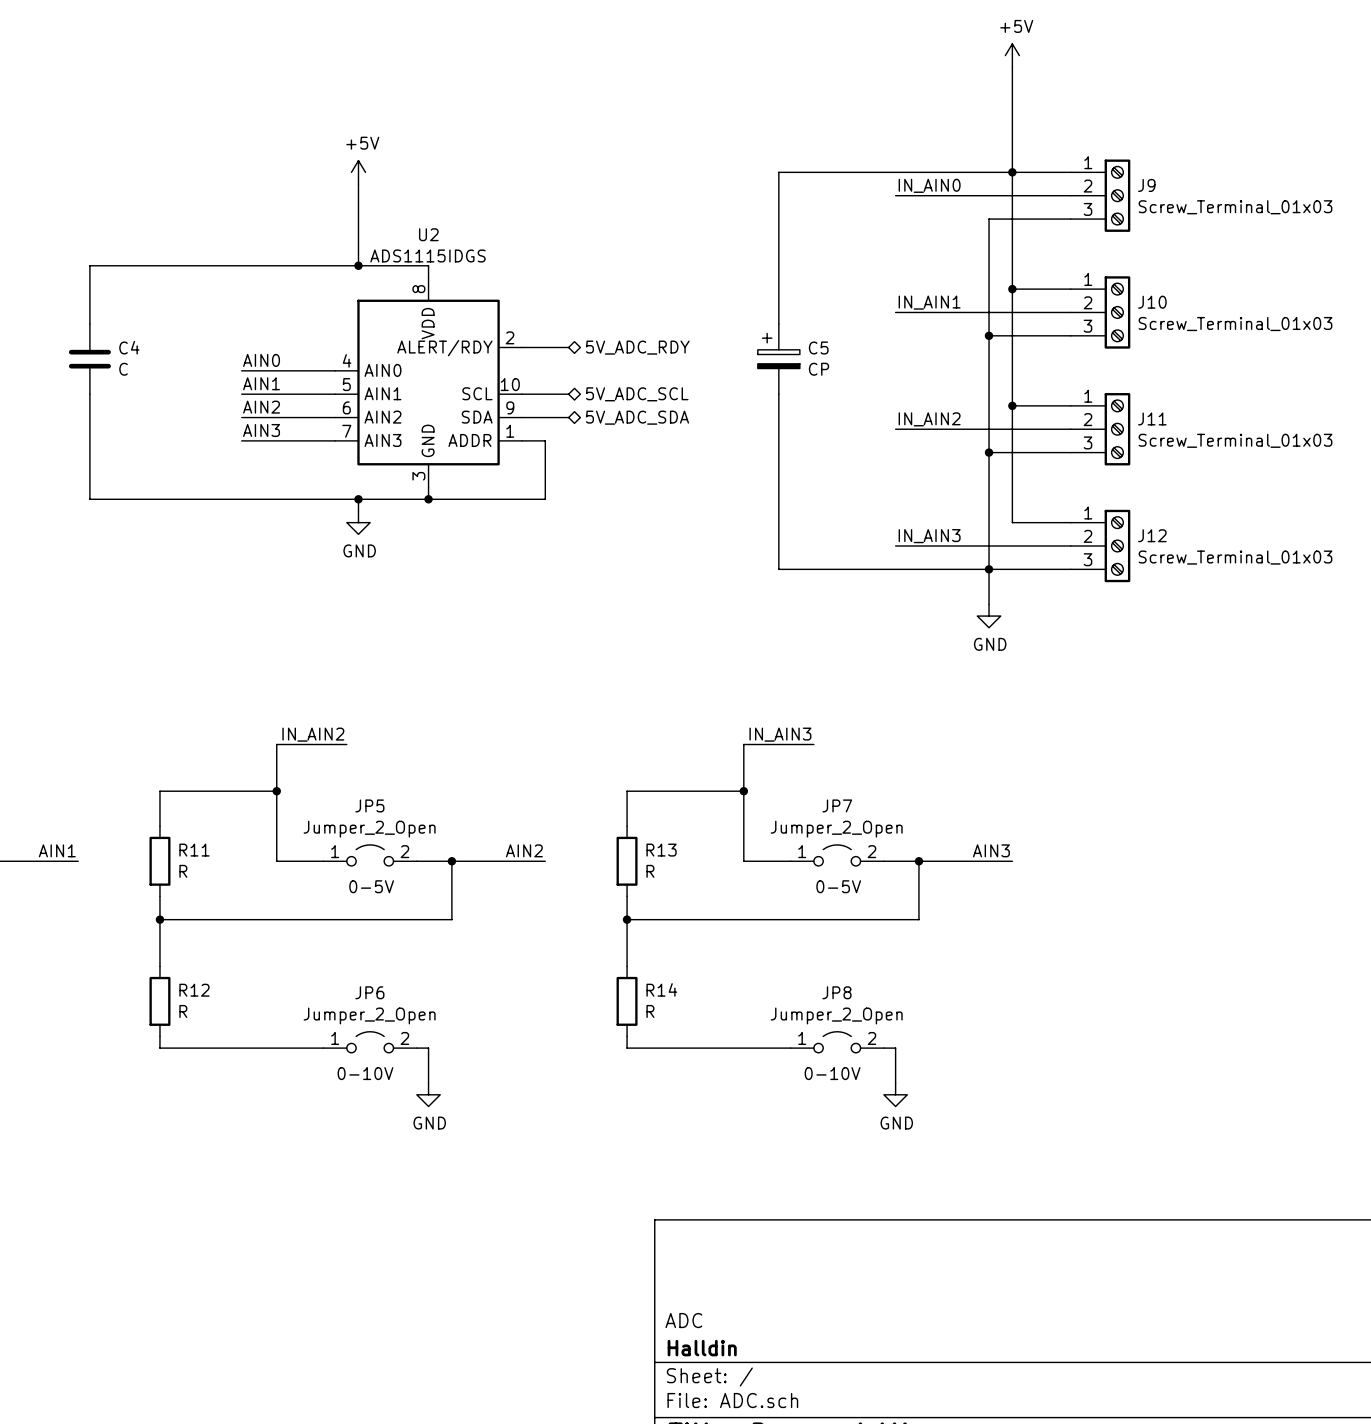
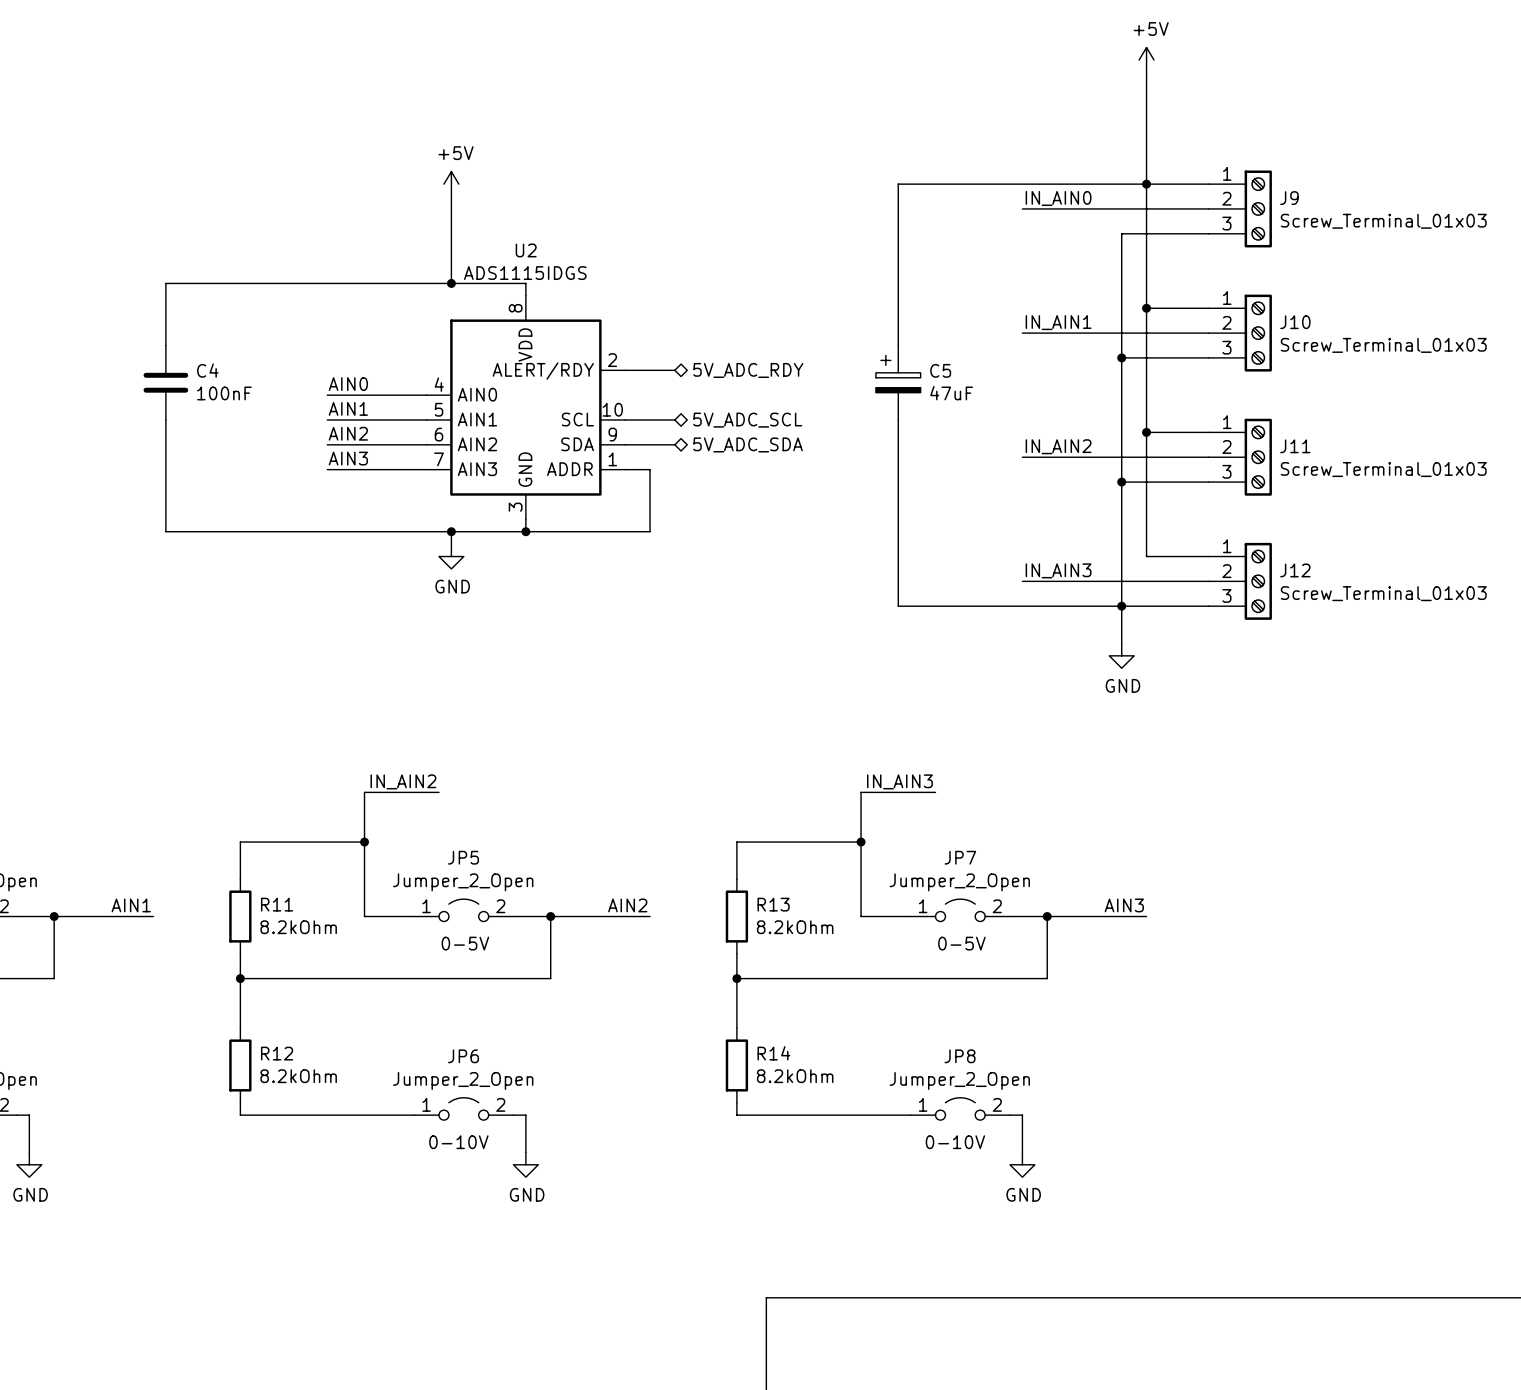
C4 value: C (123, 369) -> 100nF (224, 393)
C5 value: CP (819, 369) -> 47uF (951, 393)
R11 value: R (183, 871) -> 8.2kOhm (298, 927)
R13 value: R (650, 871) -> 8.2kOhm (795, 927)
R12 value: R (183, 1011) -> 8.2kOhm (298, 1076)
R14 value: R (650, 1011) -> 8.2kOhm (795, 1076)

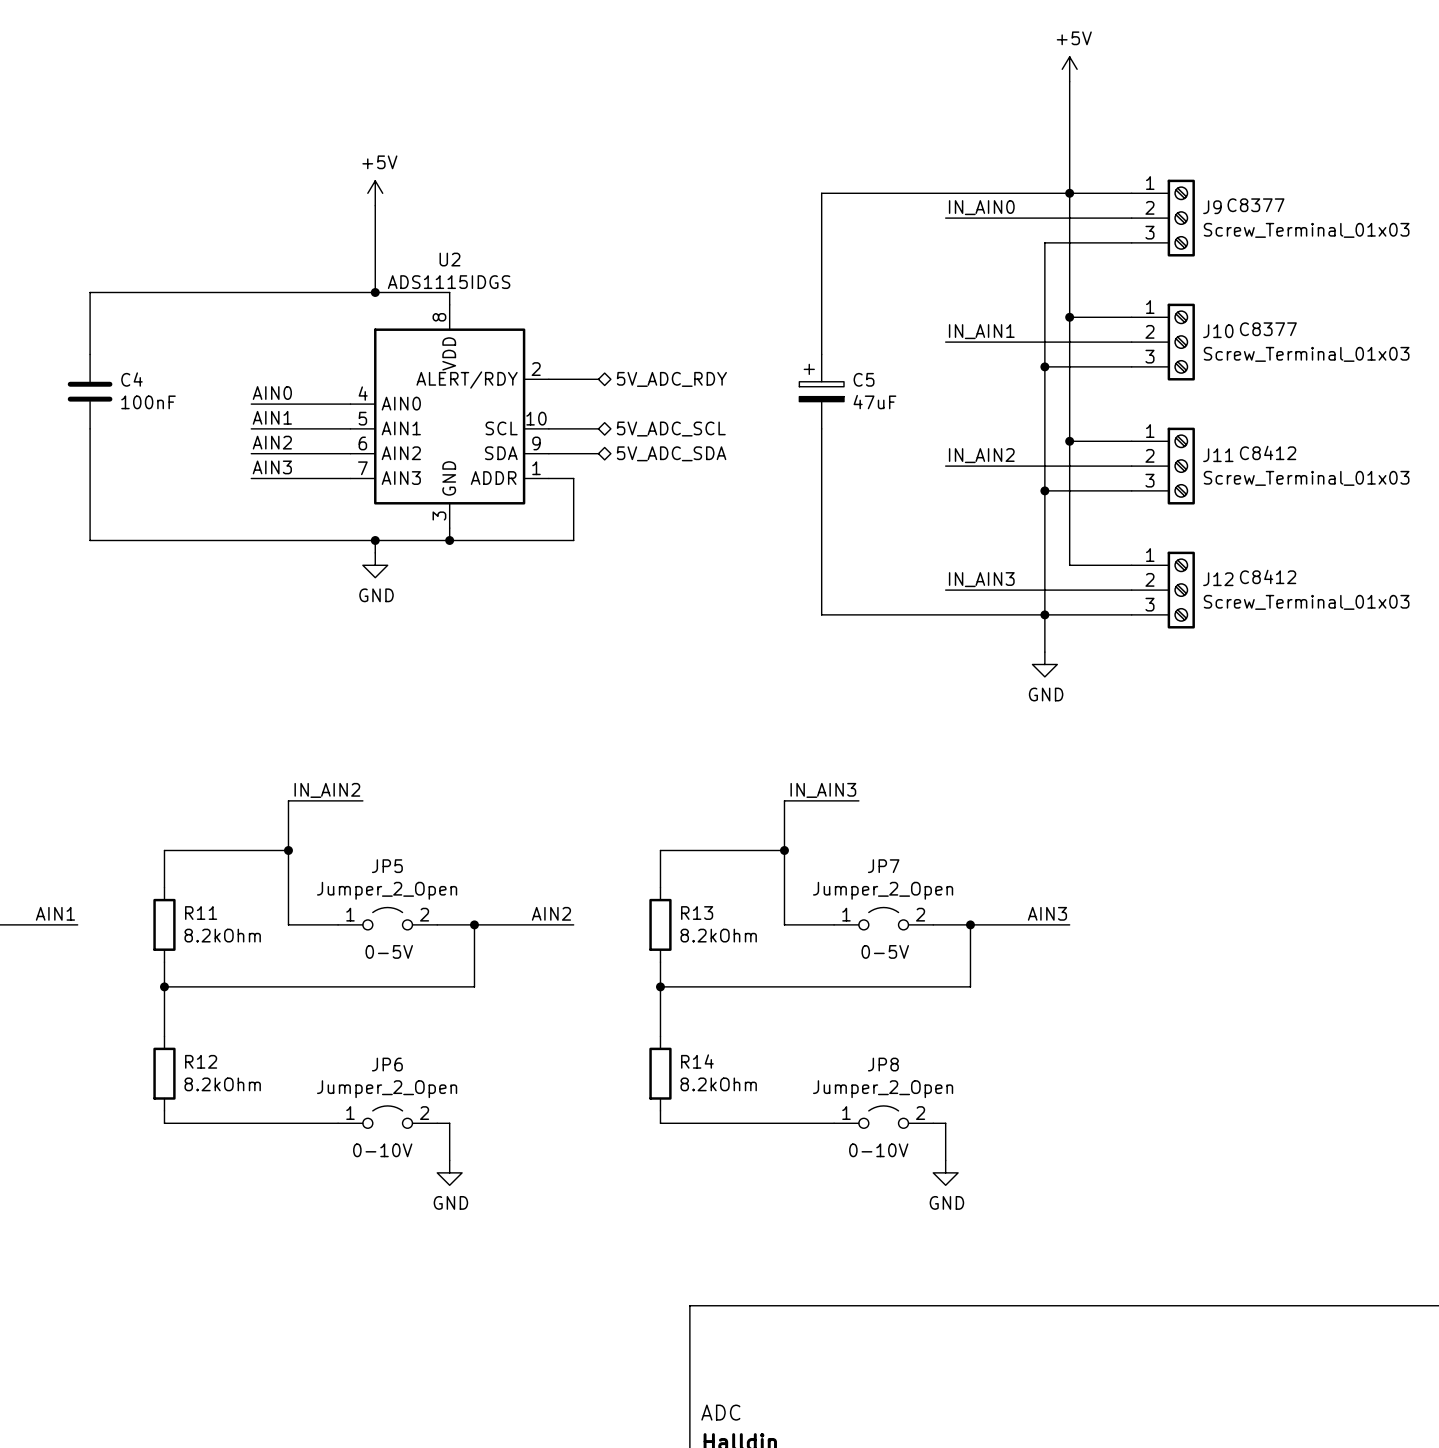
J9 text: none -> C8377 (1255, 205)
J10 text: none -> C8377 (1268, 329)
J11 text: none -> C8412 (1268, 452)
J12 text: none -> C8412 (1268, 576)

